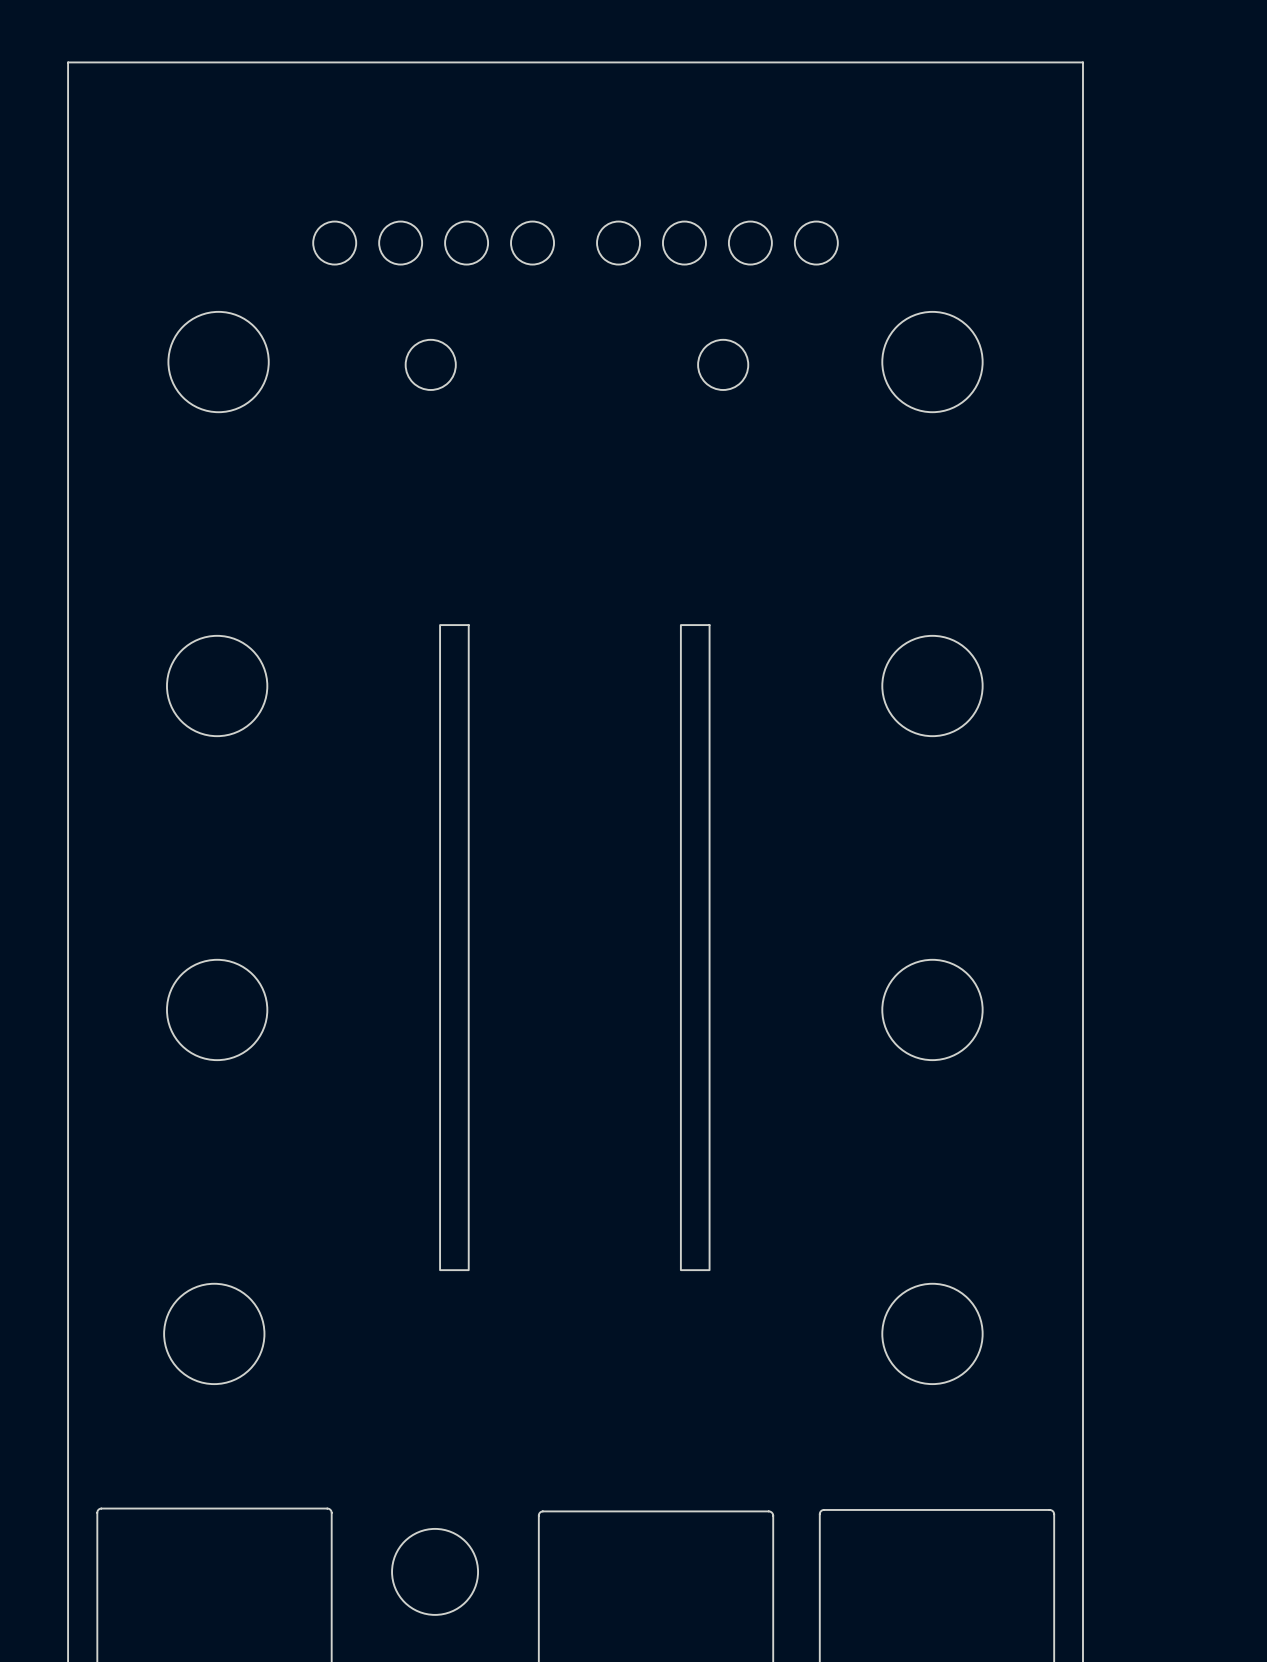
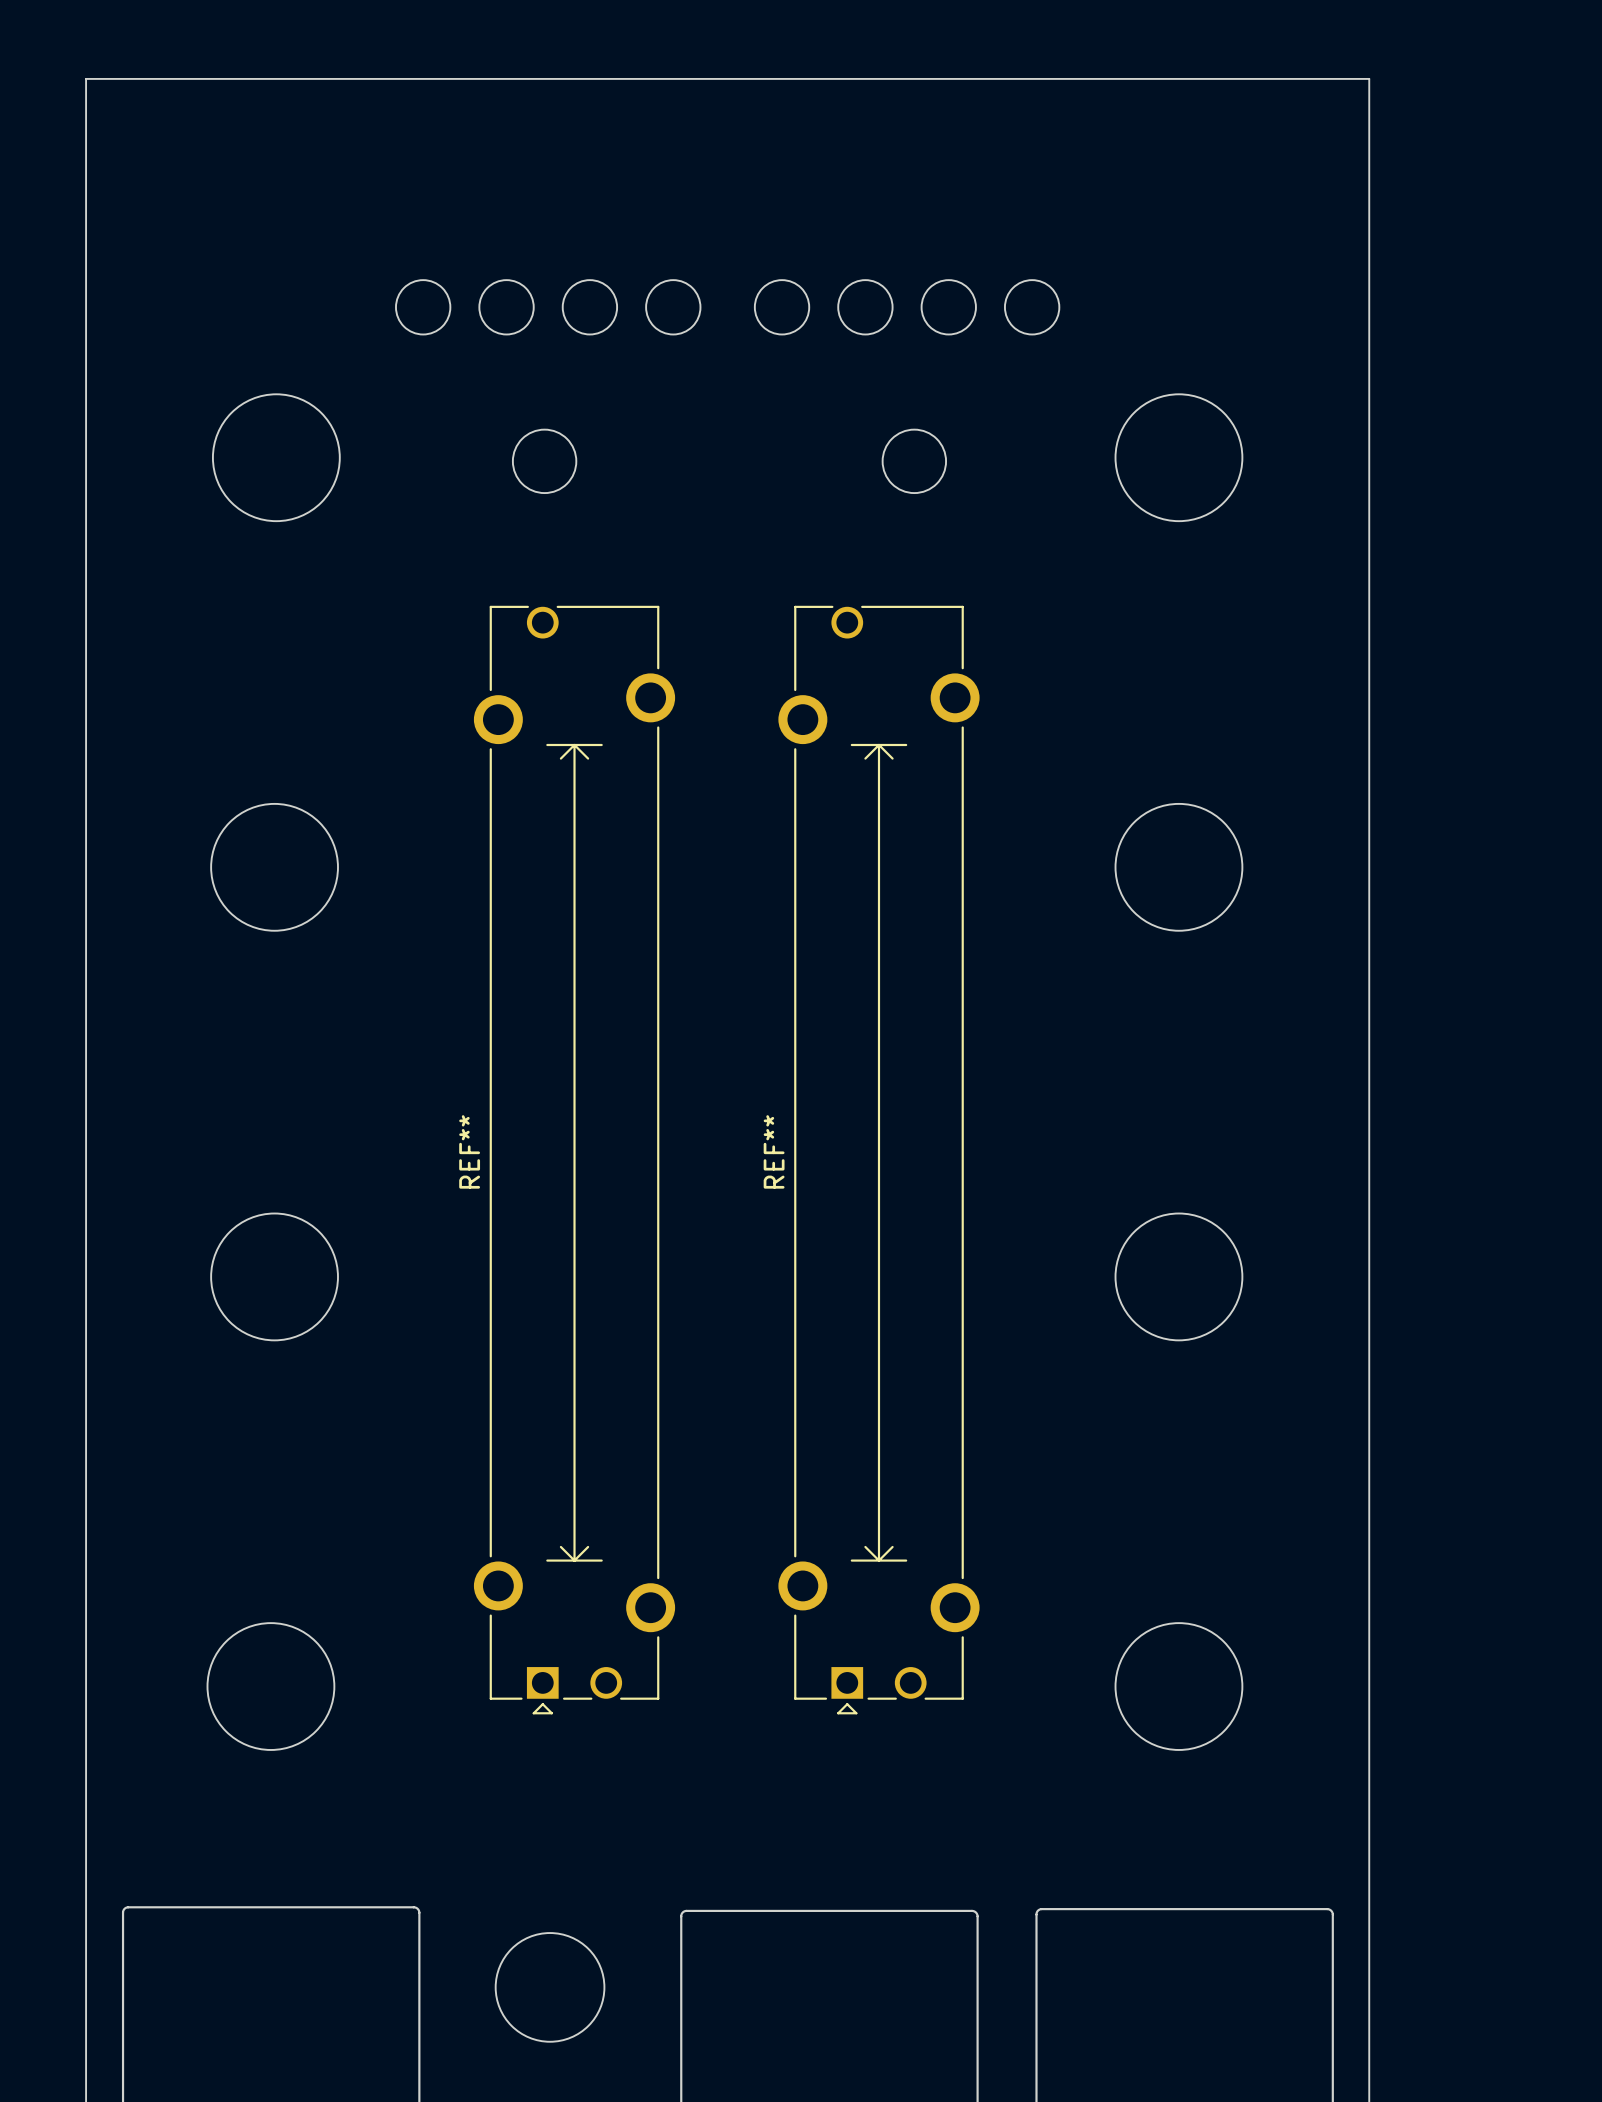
drawing: [439, 624, 470, 1272] -> none
drawing: [680, 624, 711, 1272] -> none
REF**: none -> (574, 1160)
REF**: none -> (878, 1160)

